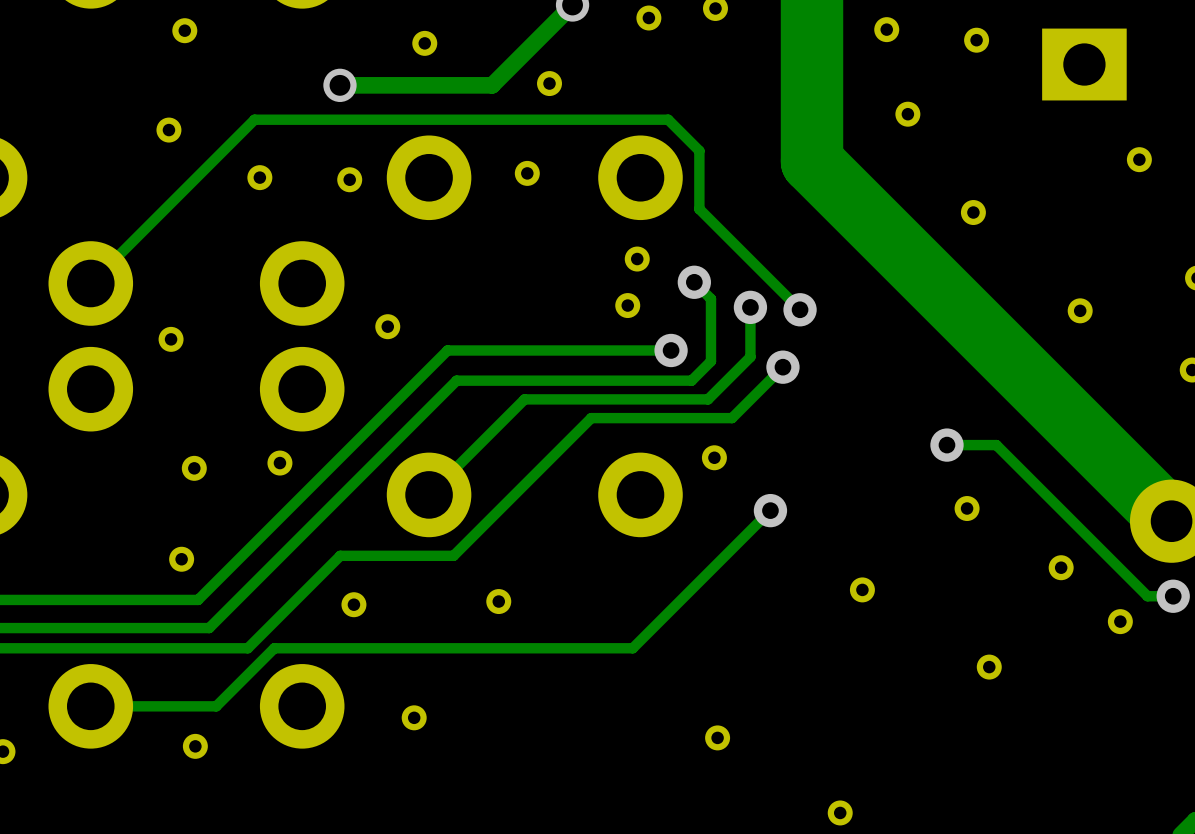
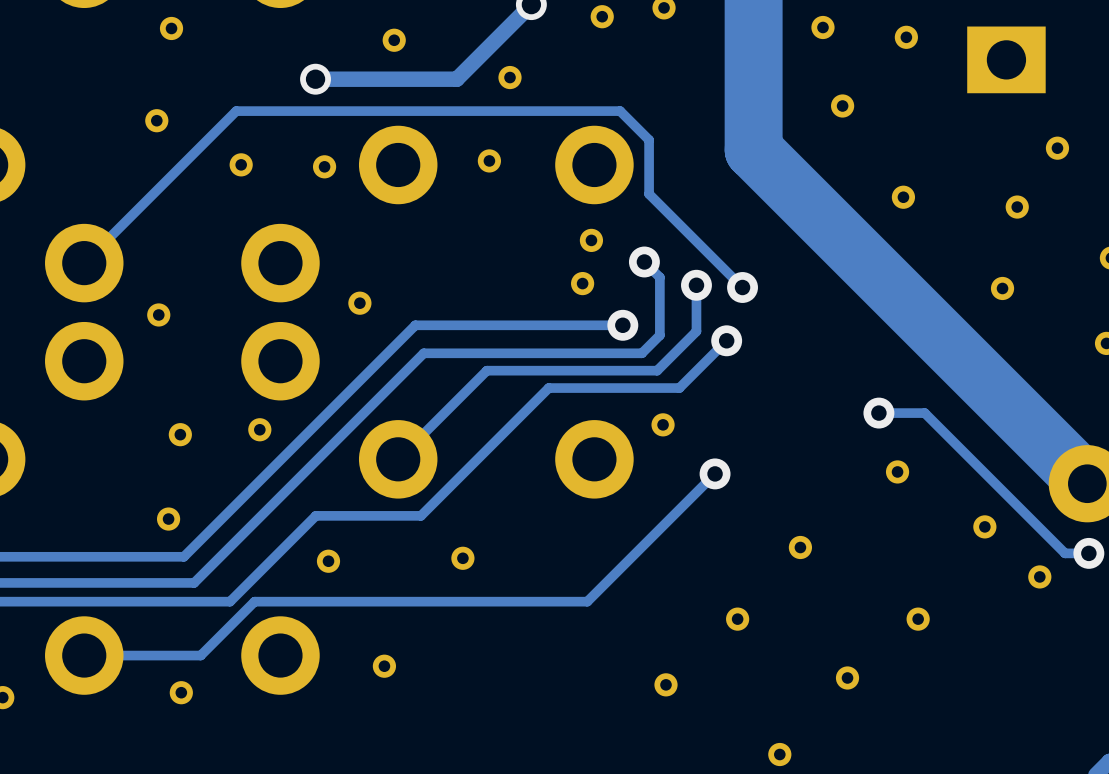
part: none -> (1017, 207)
part: none -> (737, 619)
part: none -> (847, 677)

